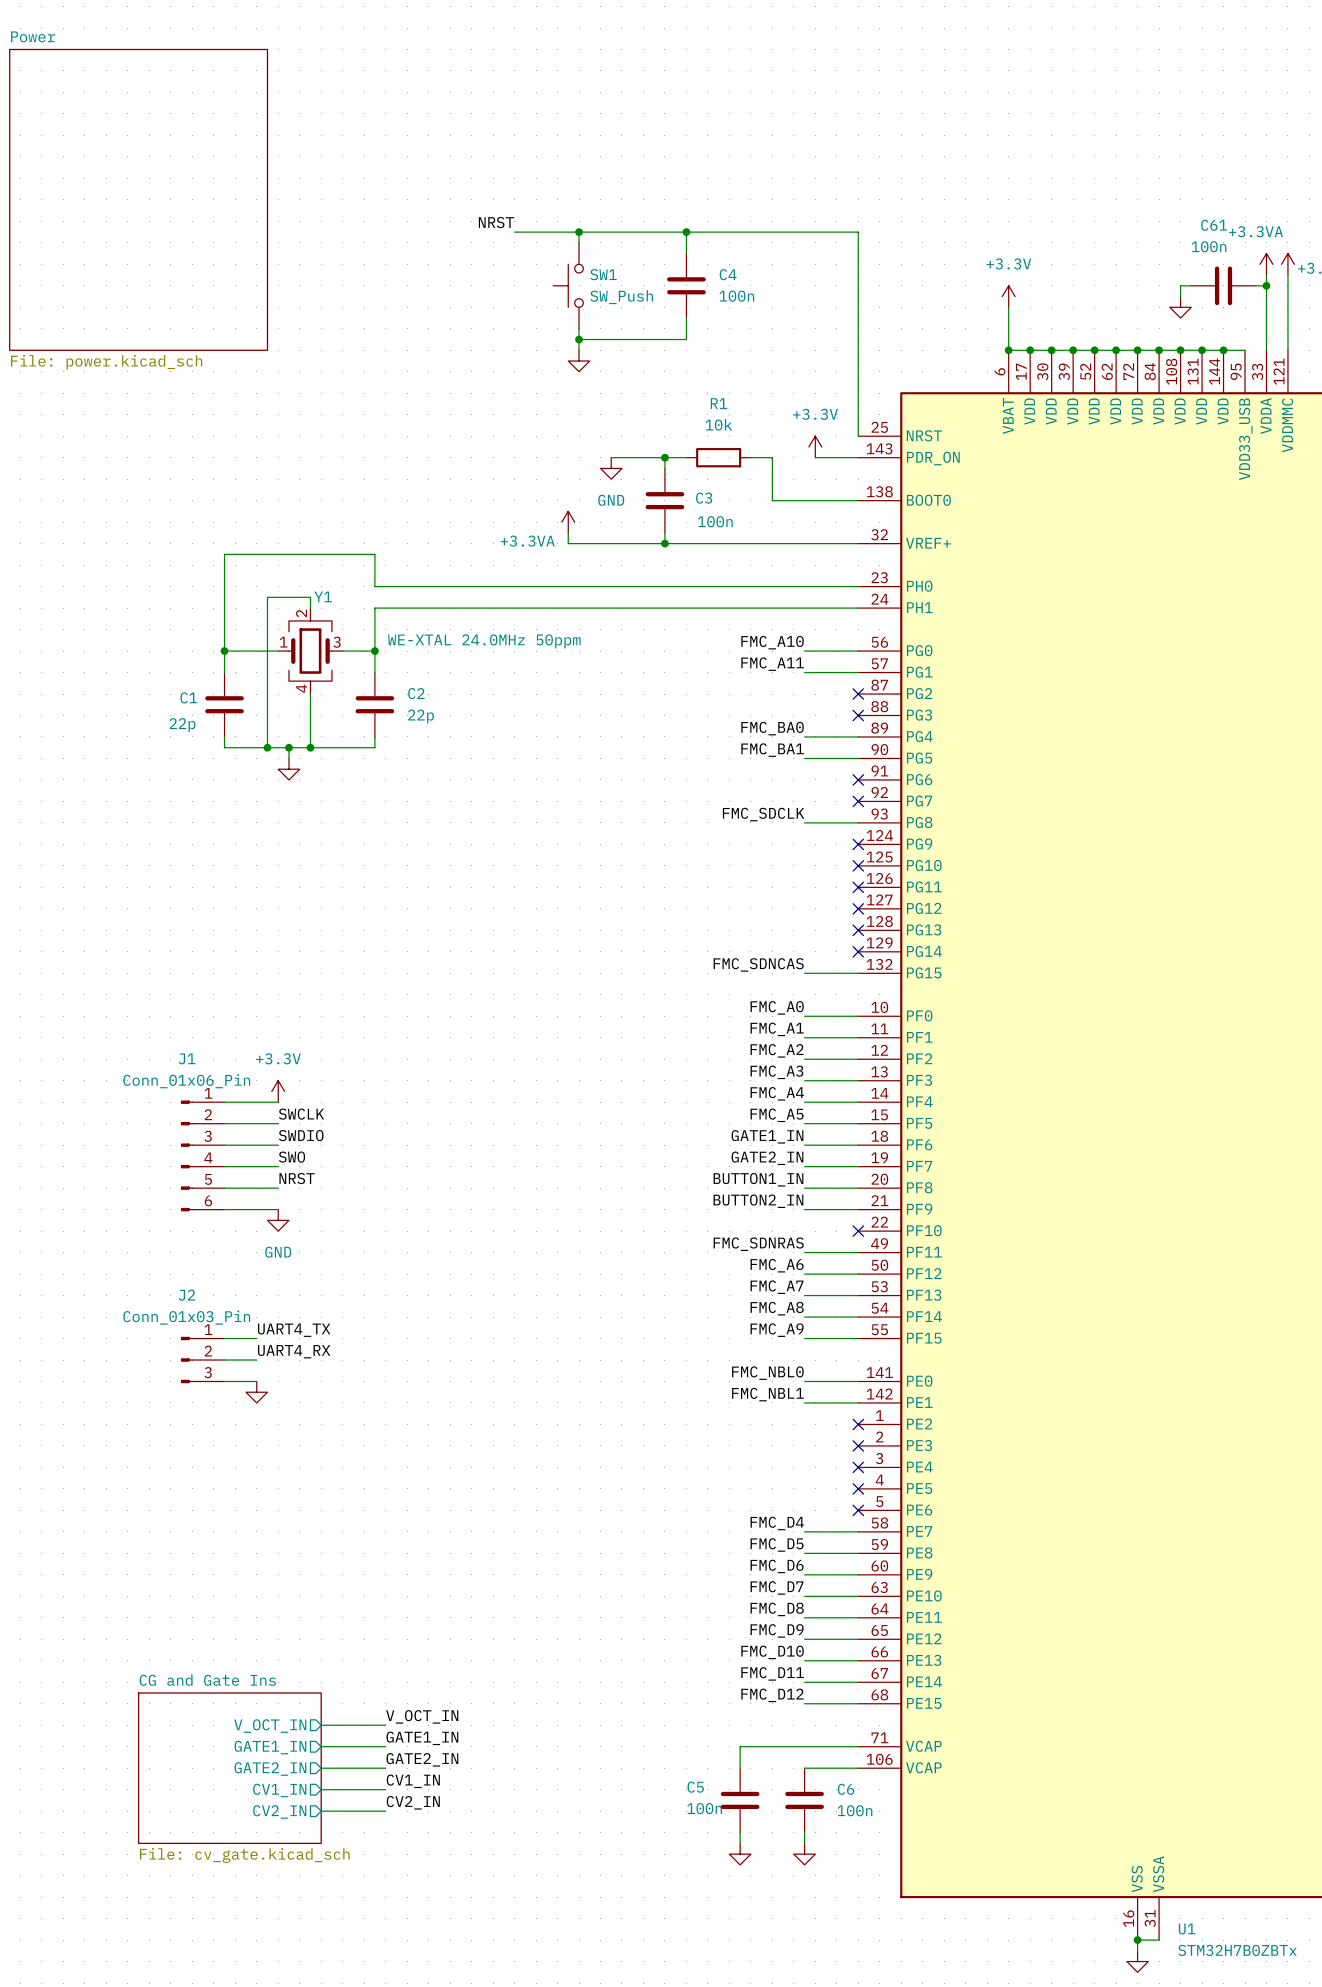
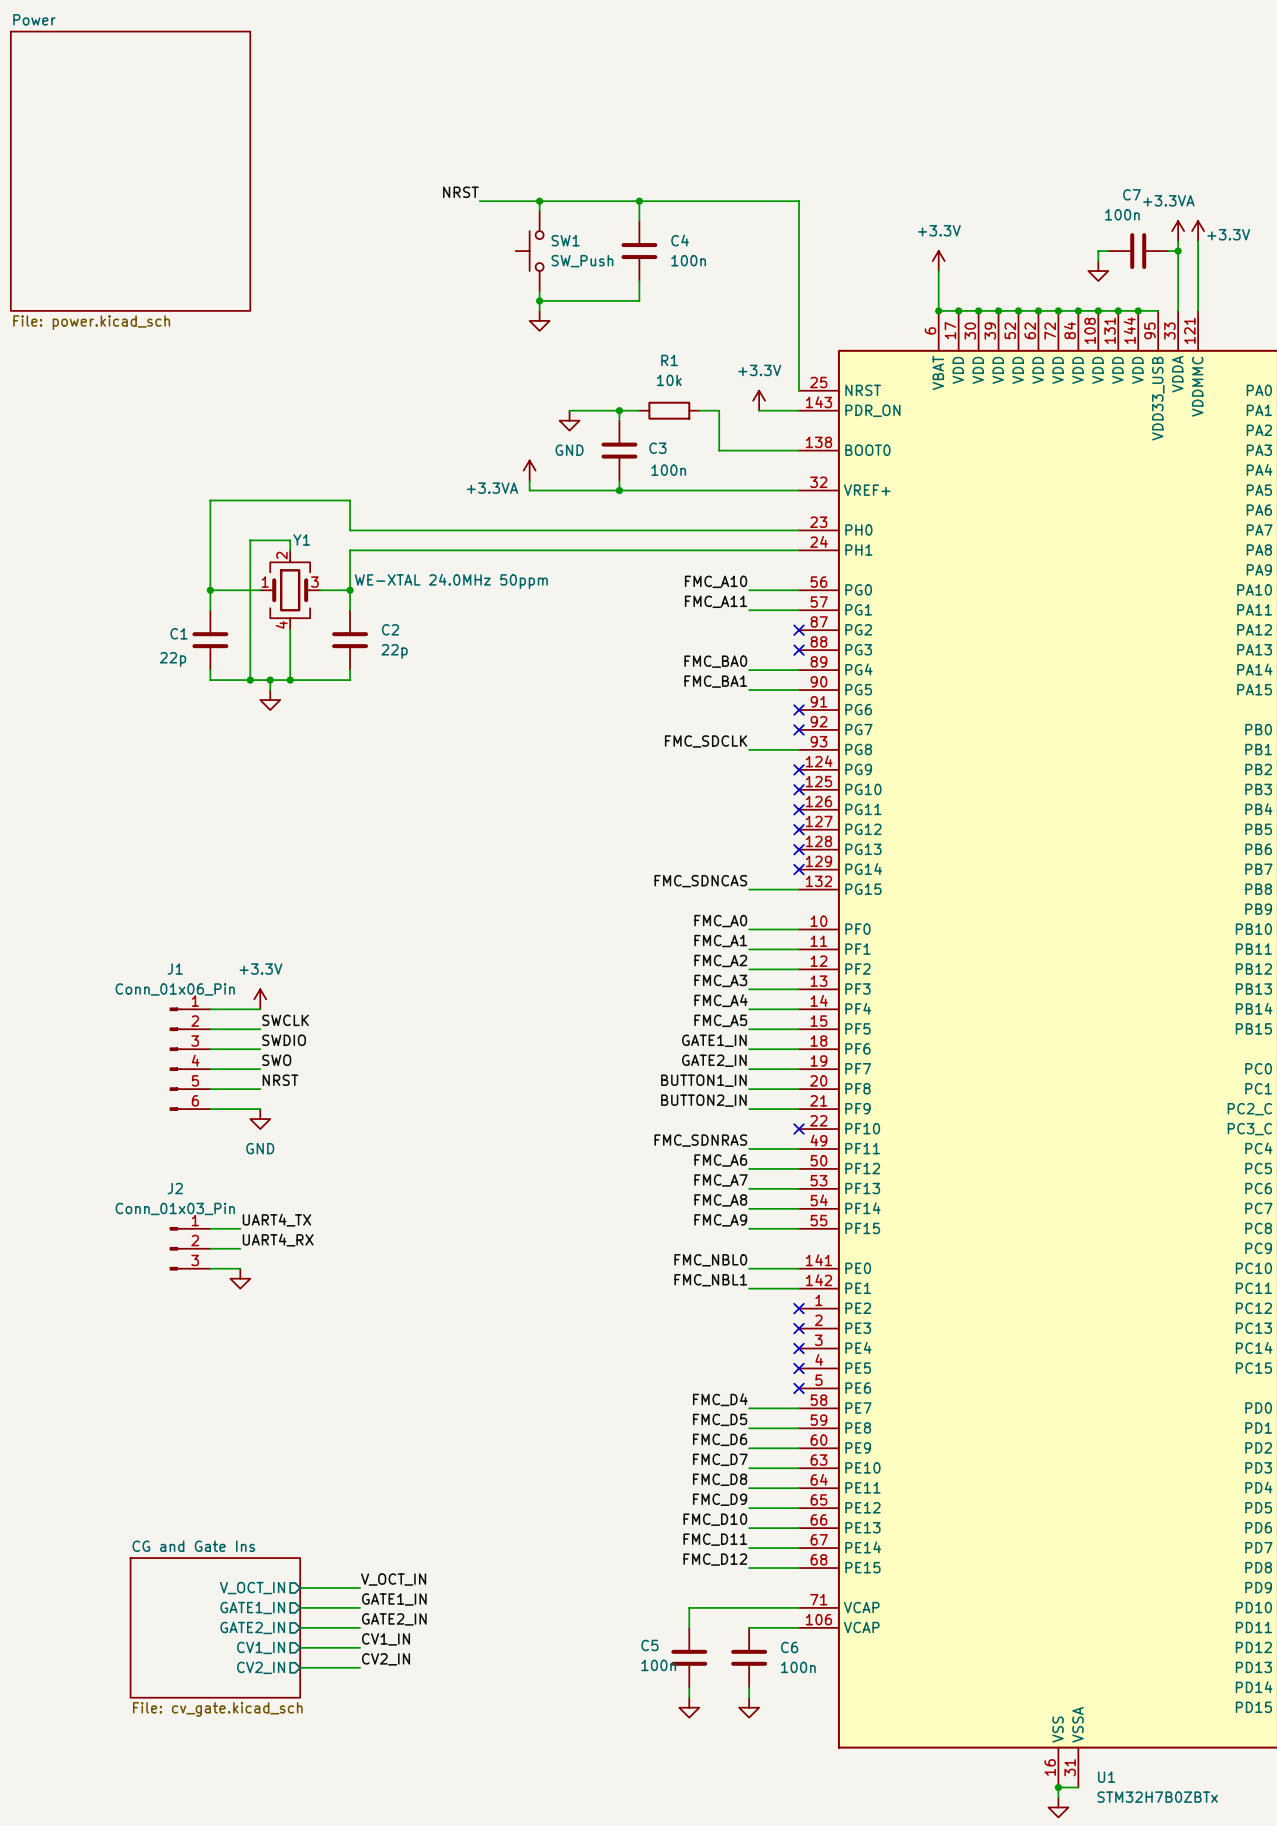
C61 name: C61 (1214, 225) -> C7 (1131, 194)

